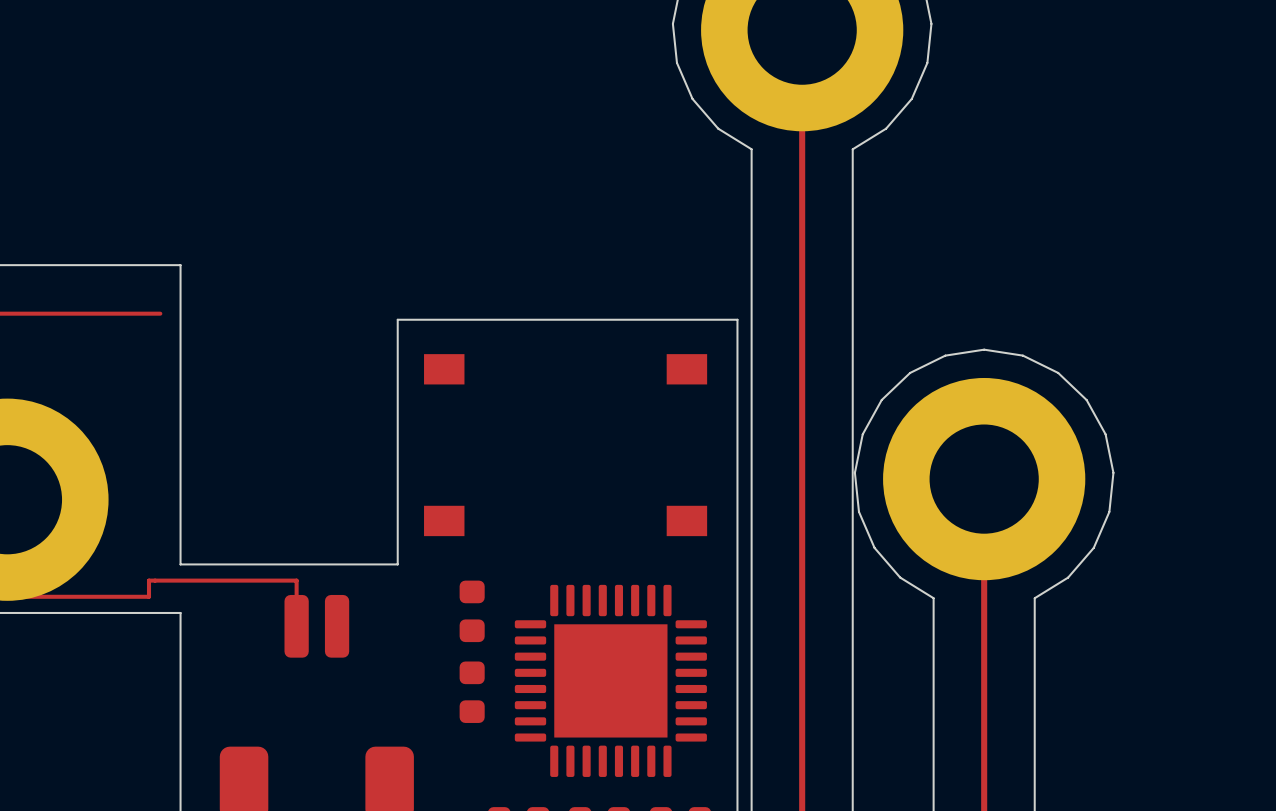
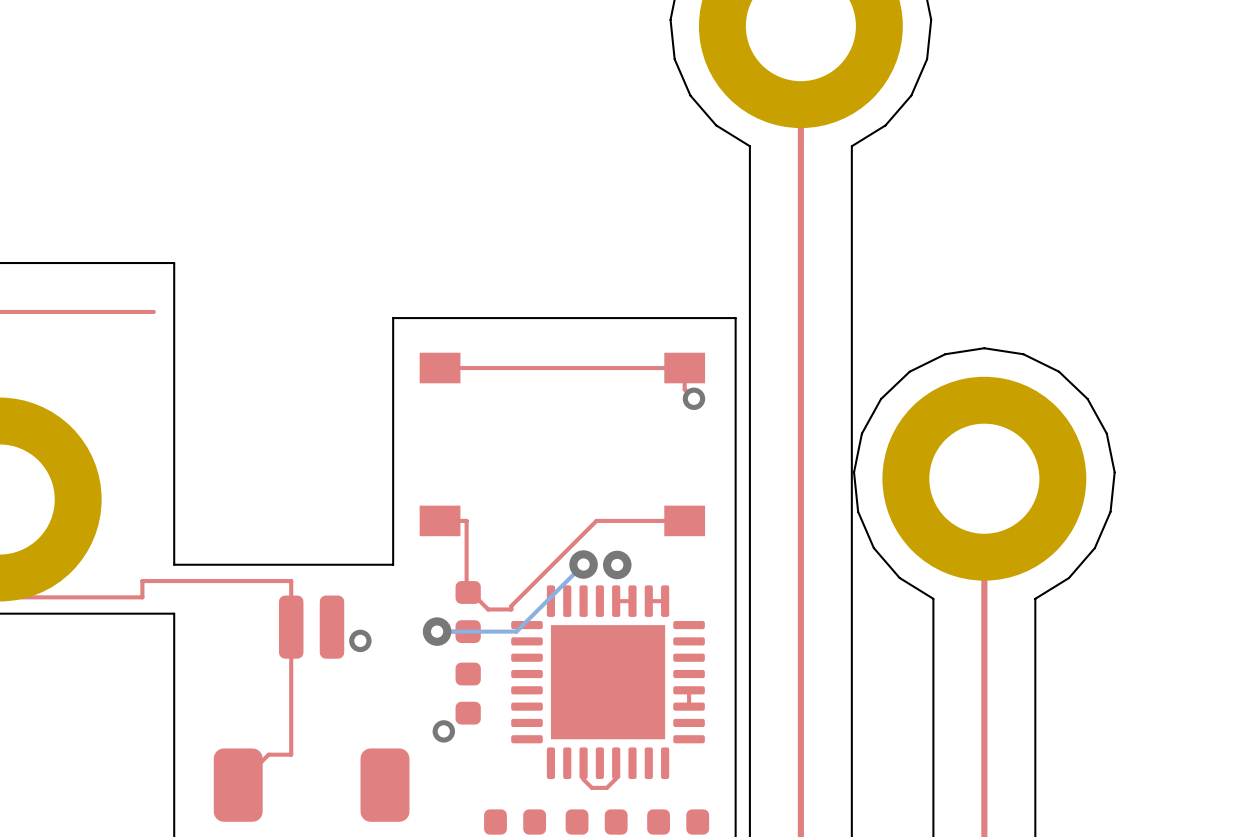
top track: none -> (440, 368) (684, 368) (684, 389) (693, 398)
via: none -> (693, 398)
top track: none -> (684, 520) (596, 520) (511, 606) (511, 609) (488, 609) (471, 592) (466, 590) (466, 520) (440, 520)
bottom track: none -> (583, 564) (516, 631) (437, 631)
via: none -> (583, 564)
via: none -> (617, 564)
top track: none -> (632, 601) (616, 601)
top track: none -> (665, 601) (648, 601)
top track: none -> (291, 627) (291, 754) (268, 754) (238, 785)
via: none -> (437, 631)
via: none -> (360, 640)
top track: none -> (689, 690) (689, 706)
via: none -> (443, 731)
top track: none -> (616, 763) (616, 778) (606, 787) (591, 787) (583, 779) (583, 763)

